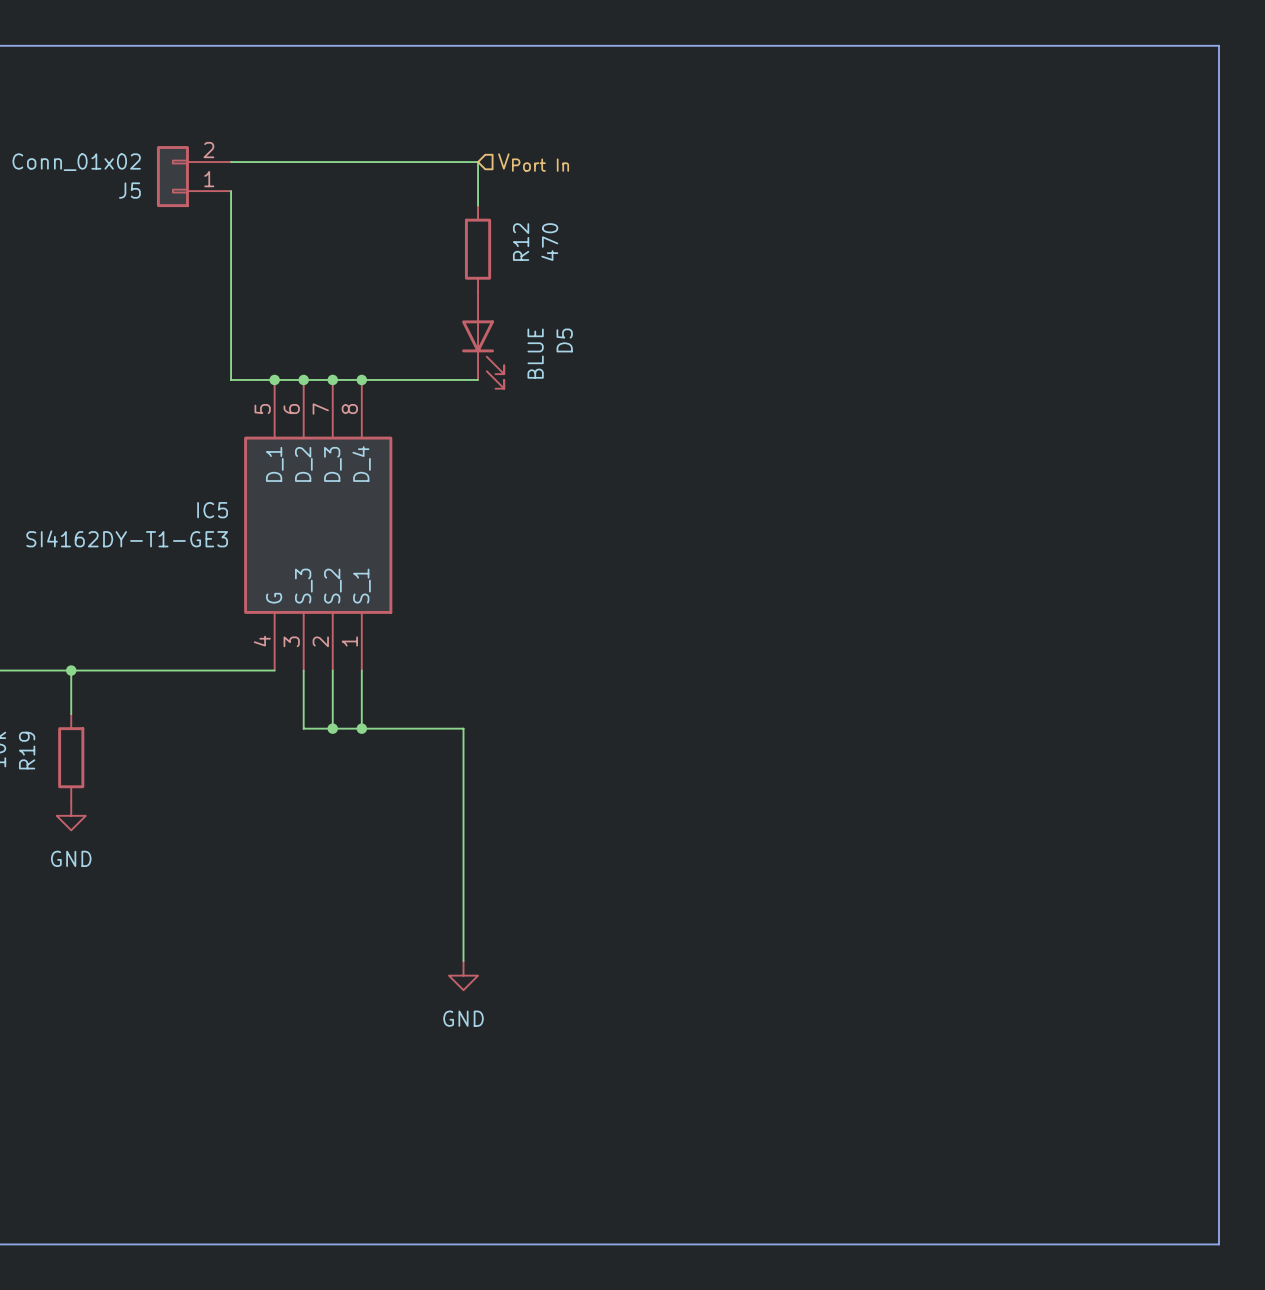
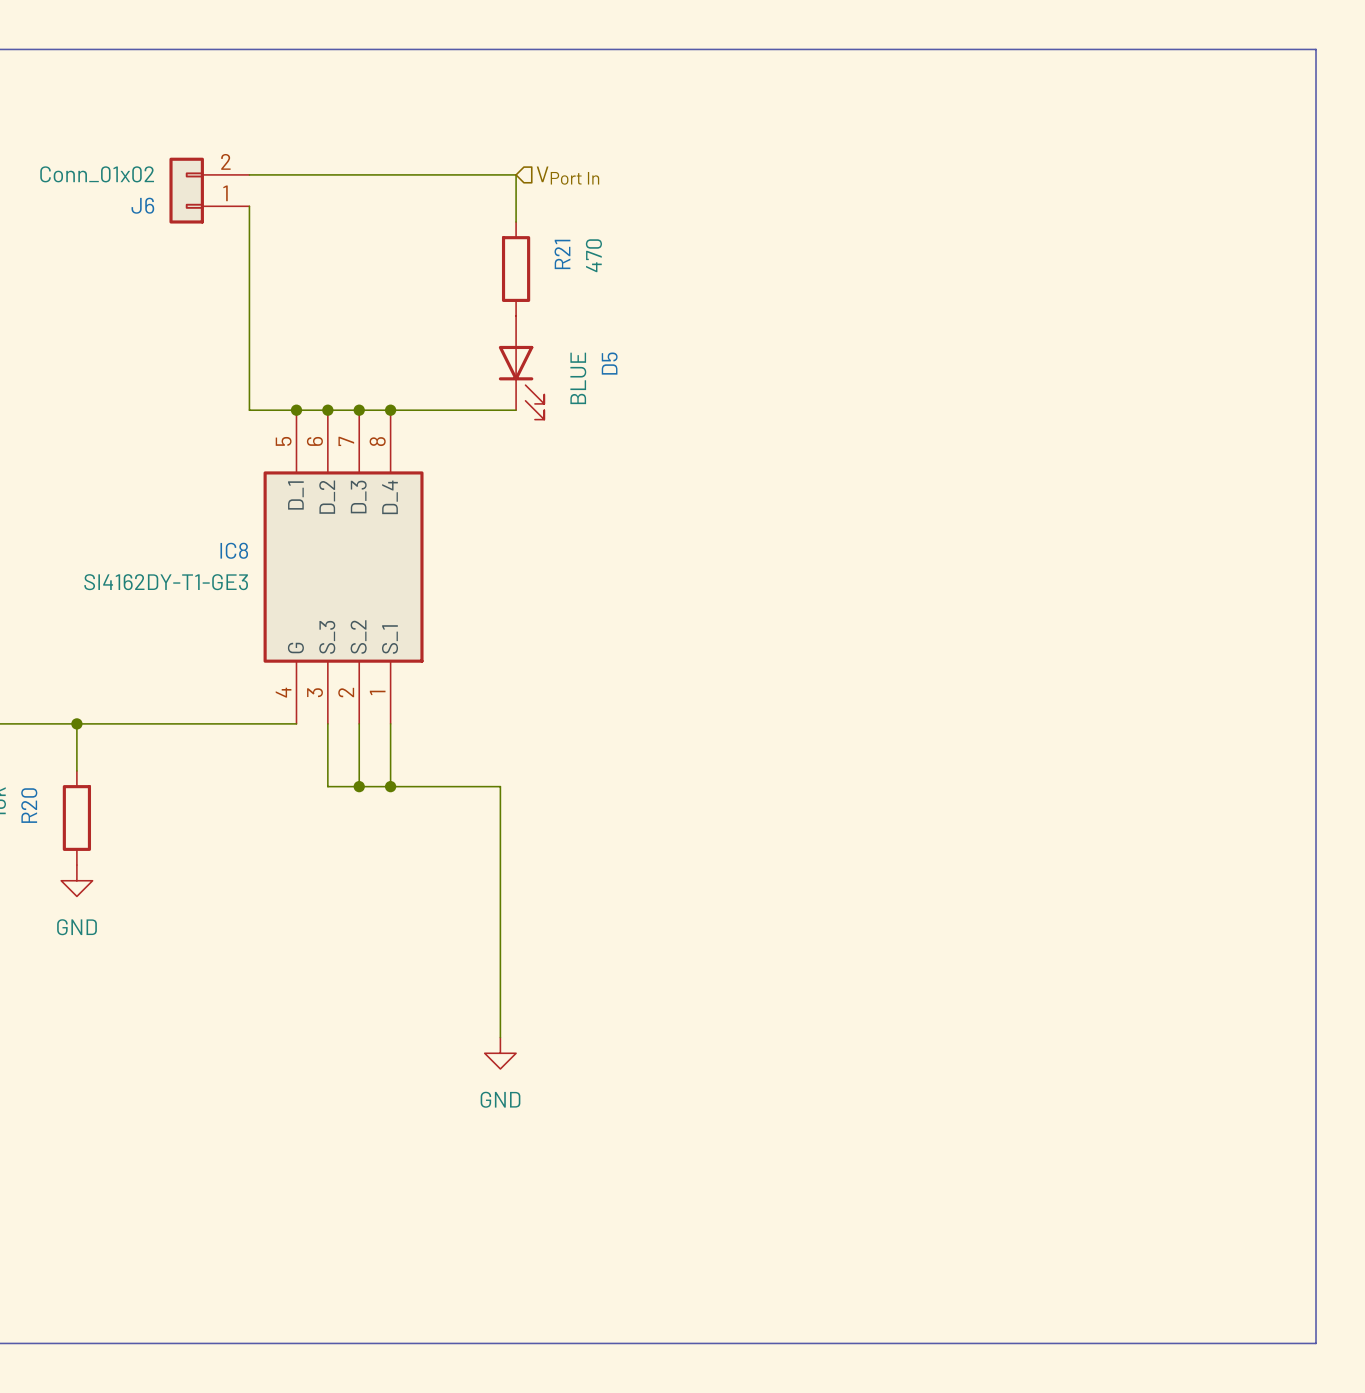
J5 name: J5 (129, 190) -> J6 (142, 205)
R12 name: R12 (521, 242) -> R21 (562, 254)
IC5 name: IC5 (212, 510) -> IC8 (234, 550)
R19 name: R19 (27, 750) -> R20 (29, 805)

